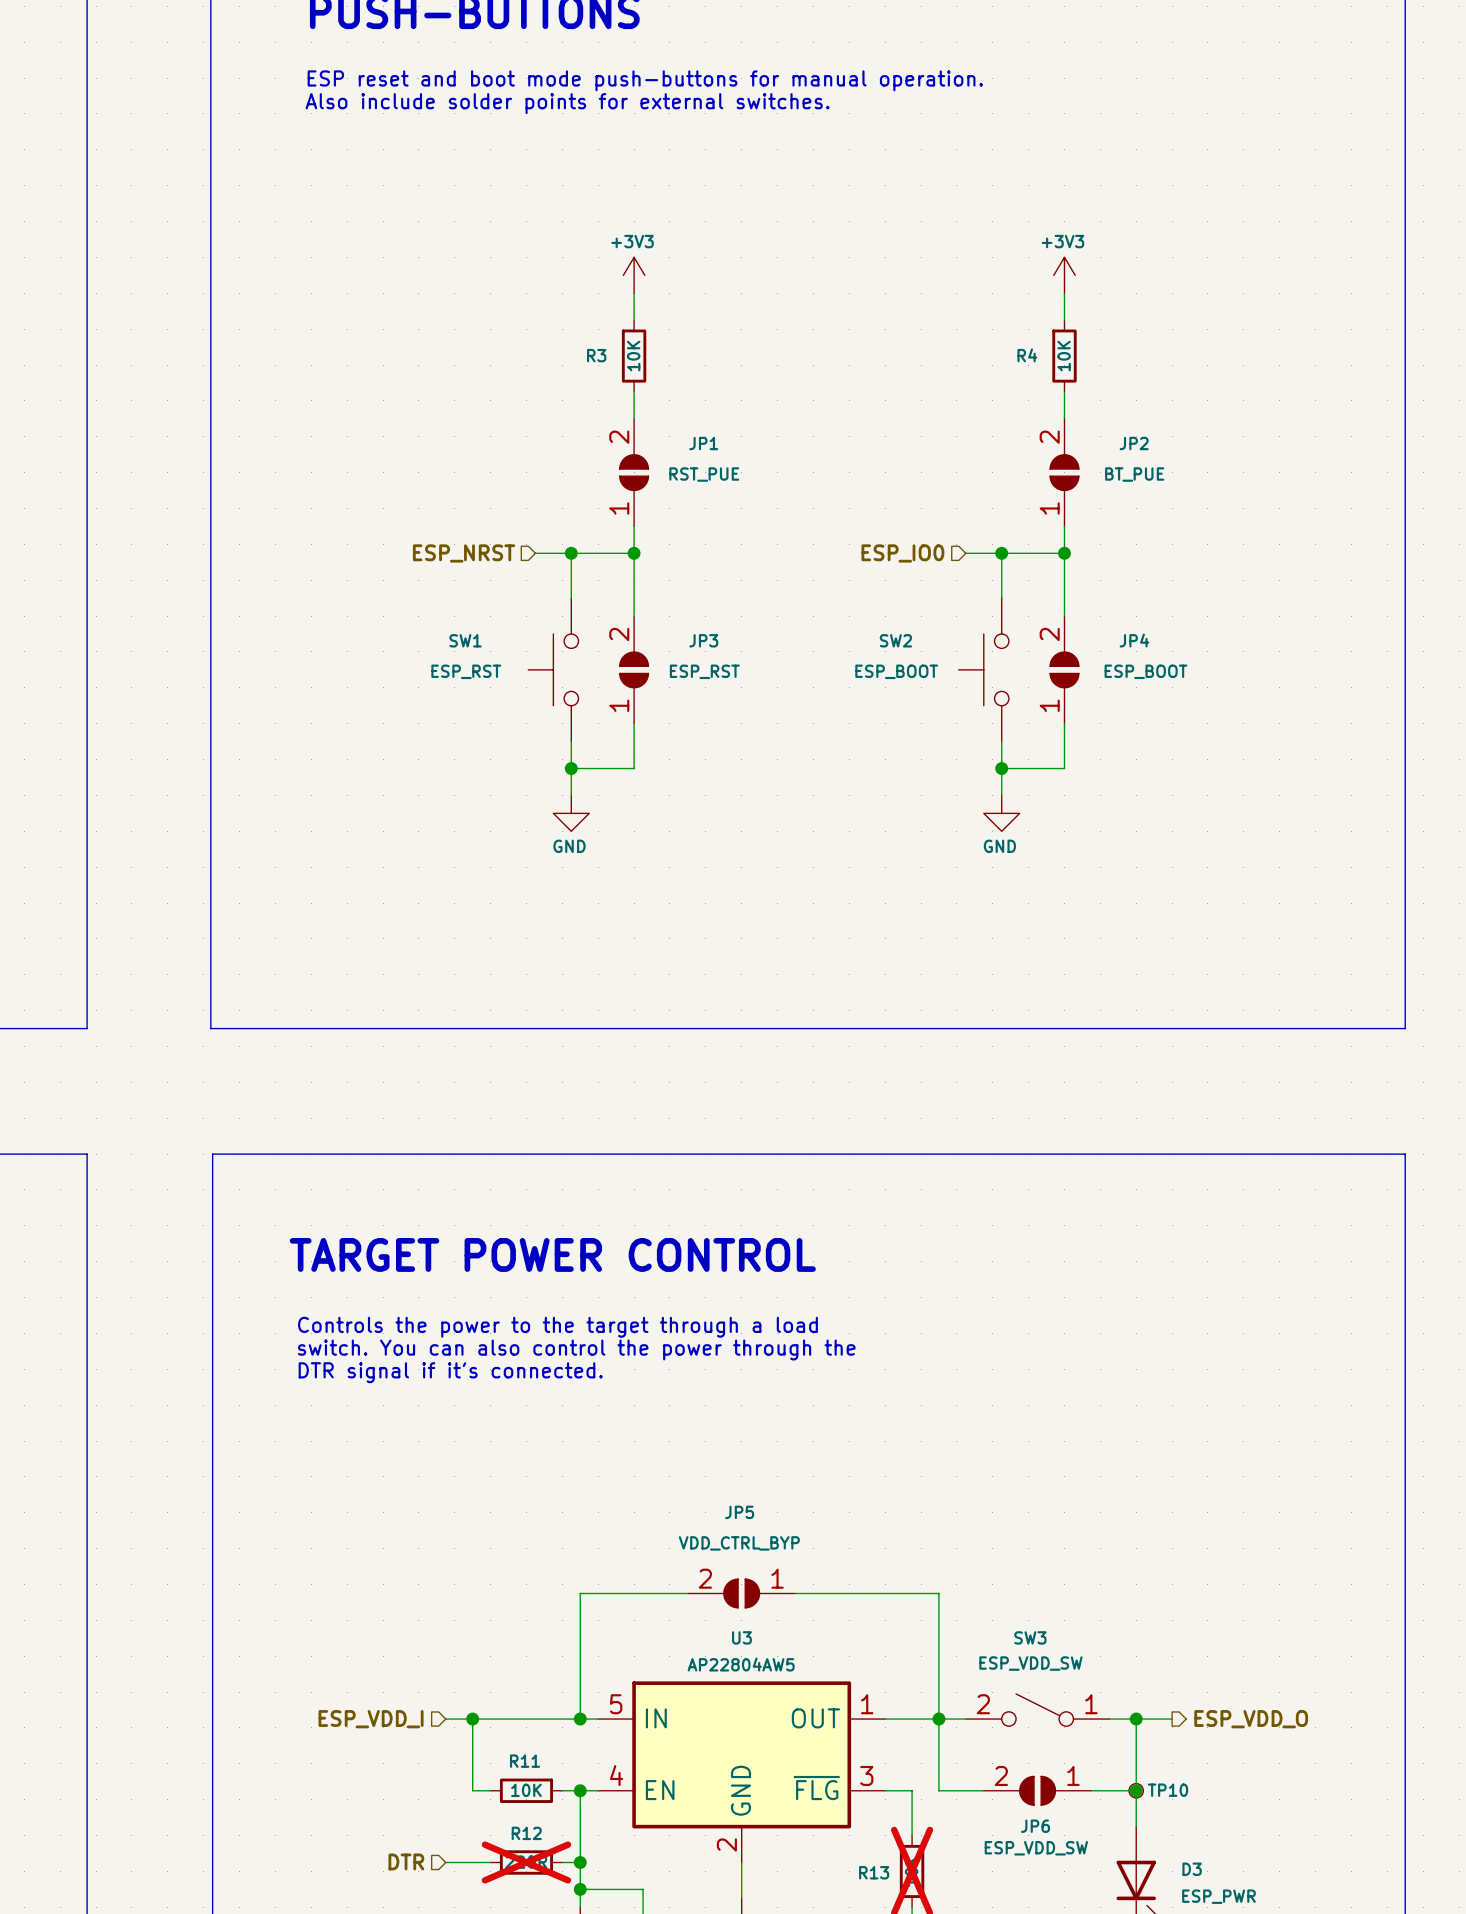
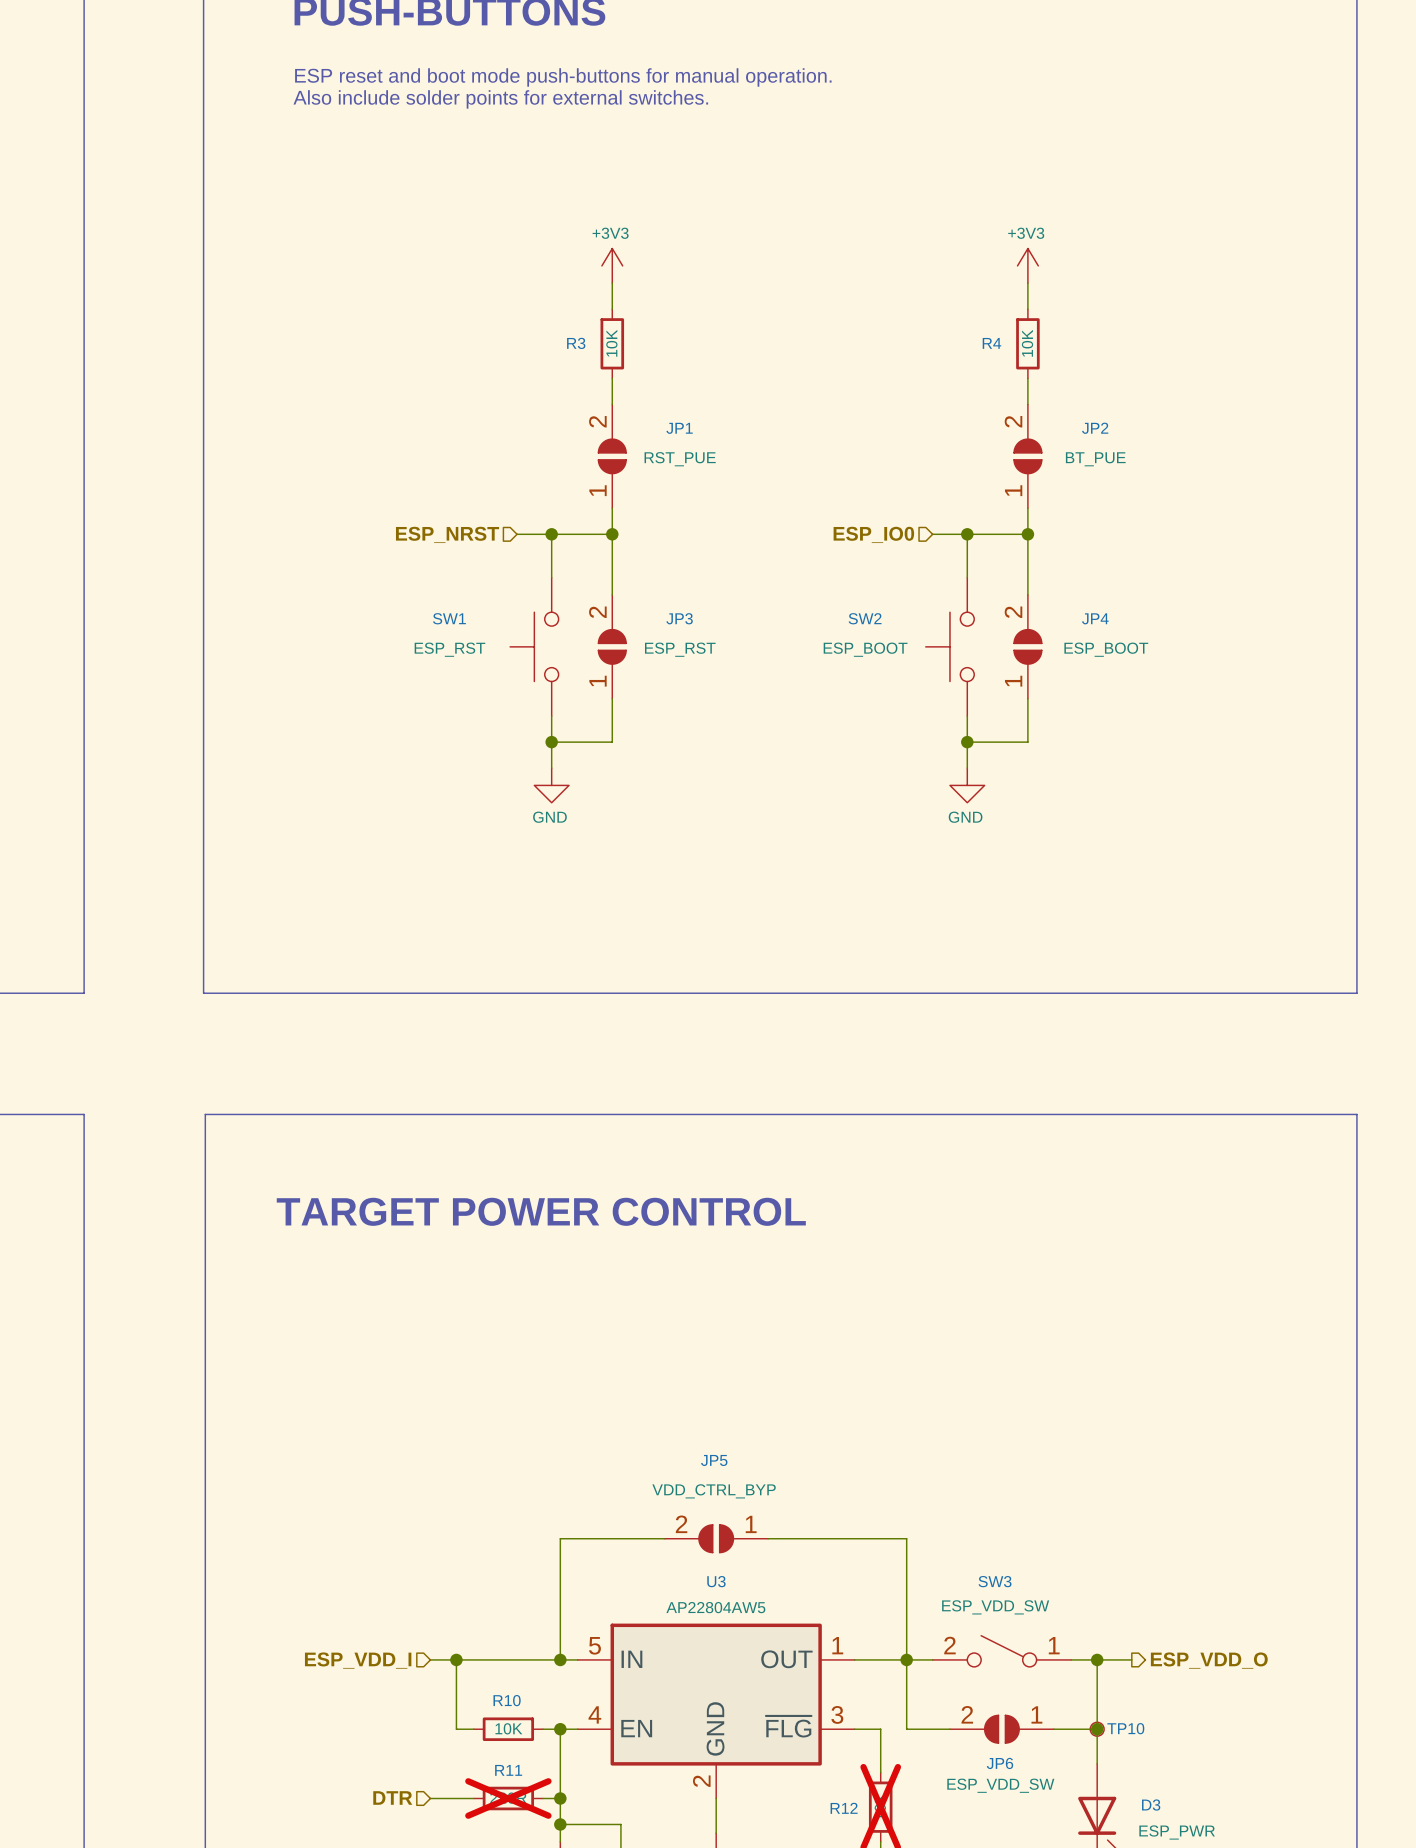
text: Controls the power to the target through a load (557, 1327) -> none
text: switch. You can also control the power through the (576, 1349) -> none
text: DTR signal if it's connected. (450, 1372) -> none
R11 name: R11 (525, 1761) -> R10 (507, 1700)
R12 name: R12 (526, 1833) -> R11 (508, 1770)
R13 name: R13 (874, 1872) -> R12 (844, 1808)

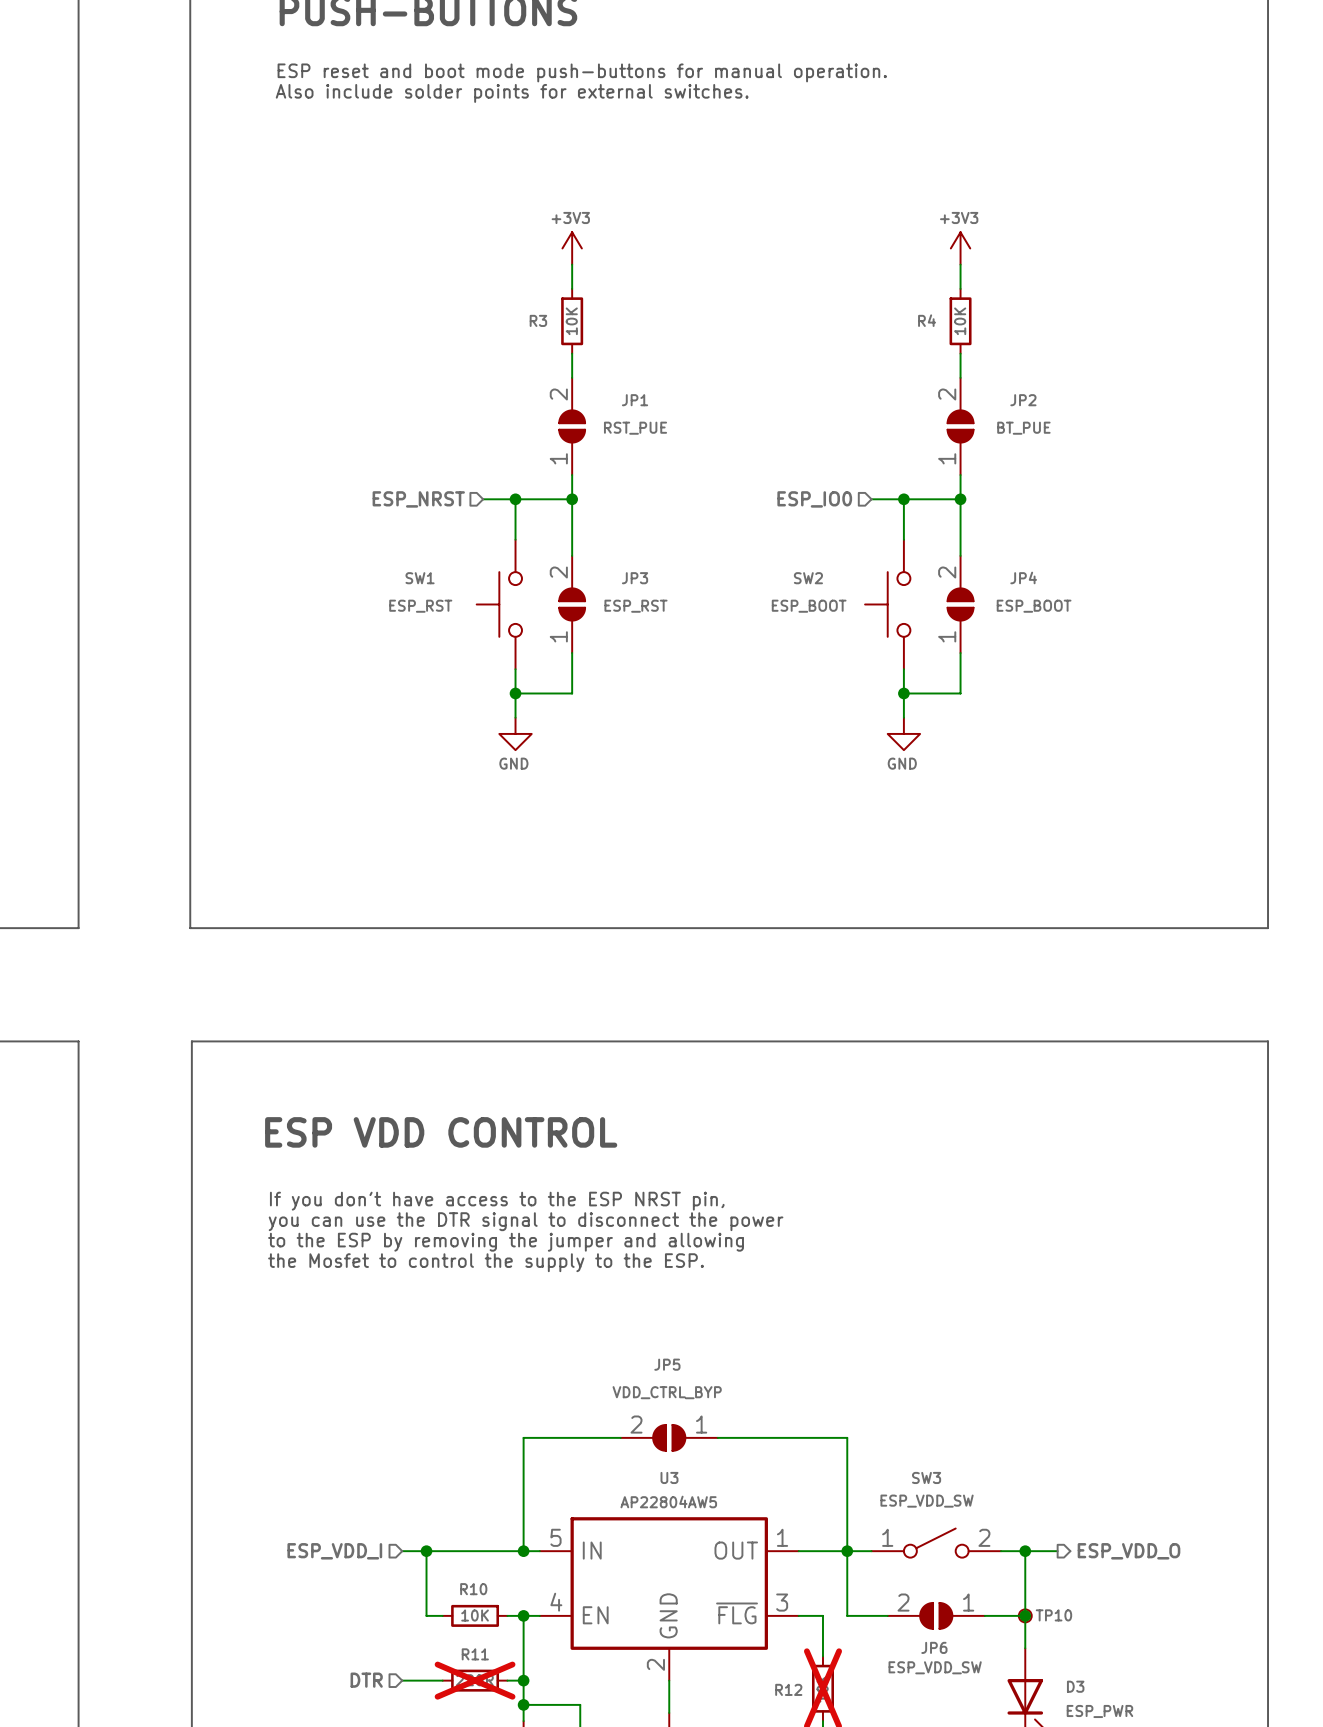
text: TARGET POWER CONTROL (541, 1211) -> ESP VDD CONTROL (441, 1132)
text: none -> If you don't have access to the ESP NRST pin, (497, 1201)
text: none -> you can use the DTR signal to disconnect the power (526, 1221)
text: none -> to the ESP by removing the jumper and allowing (506, 1242)
text: none -> the Mosfet to control the supply to the ESP. (486, 1262)
SW3 flip: as is (1001, 1651) -> left-right (936, 1543)

